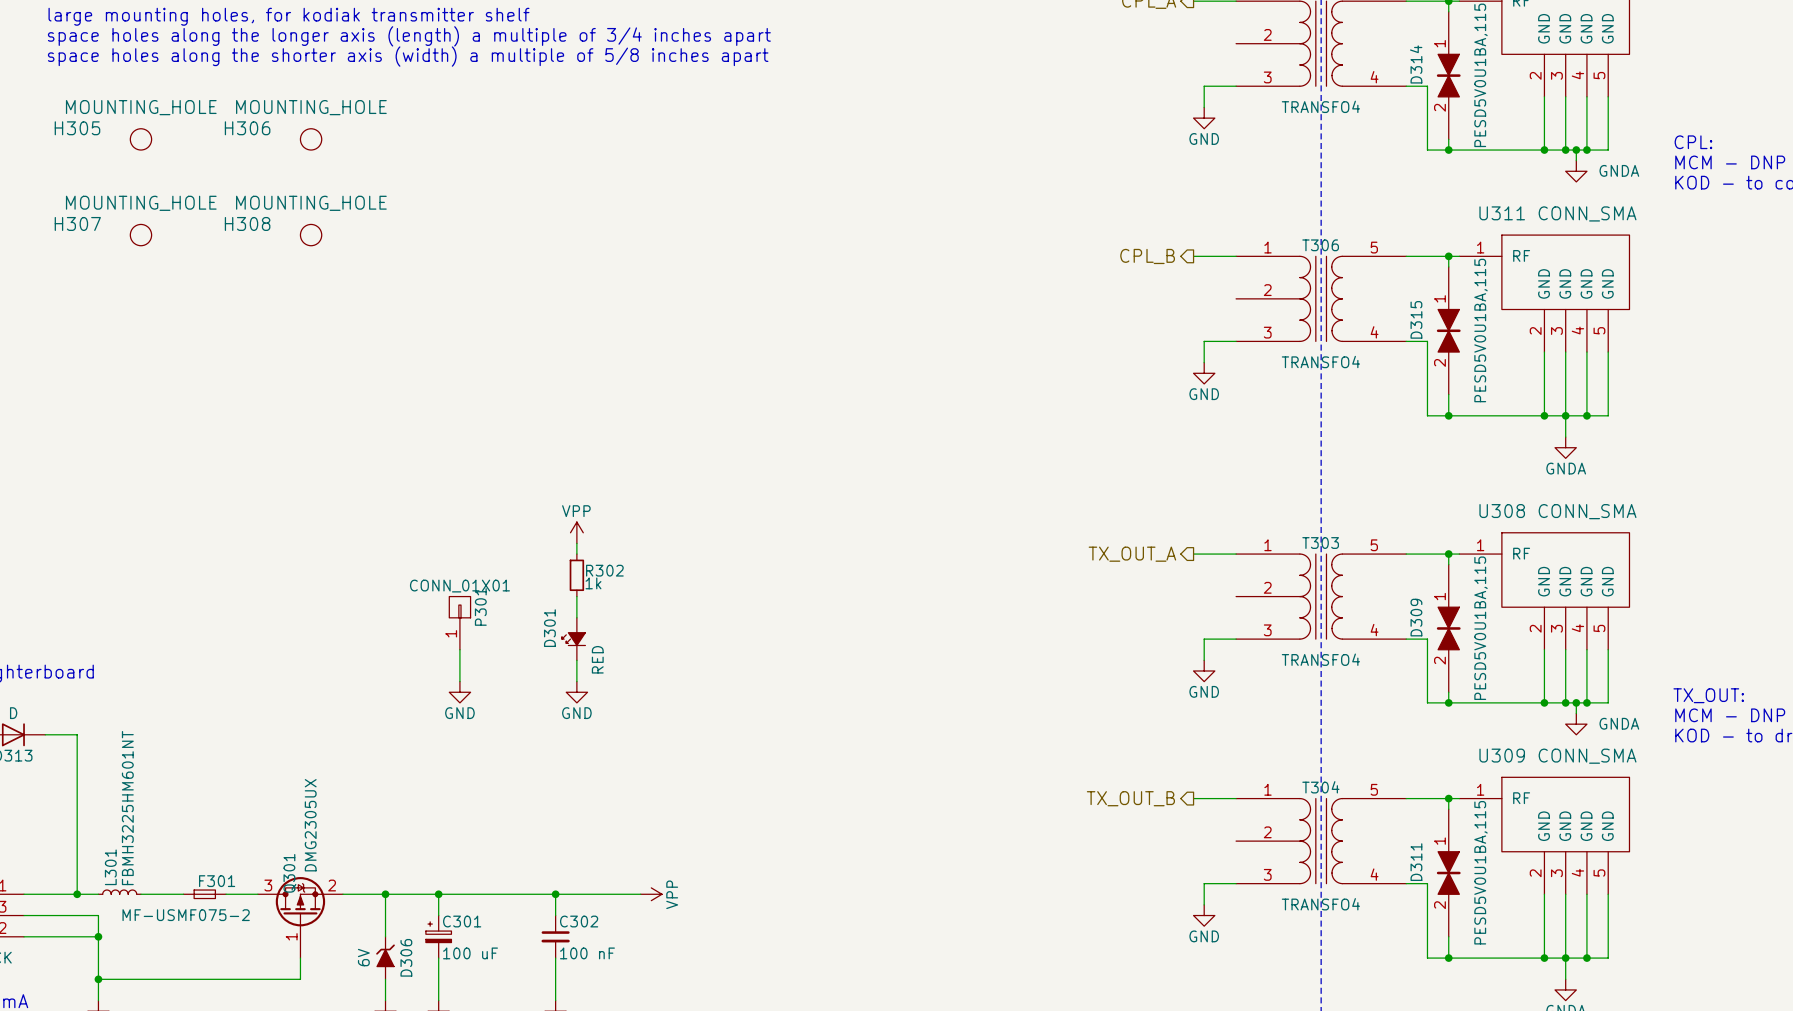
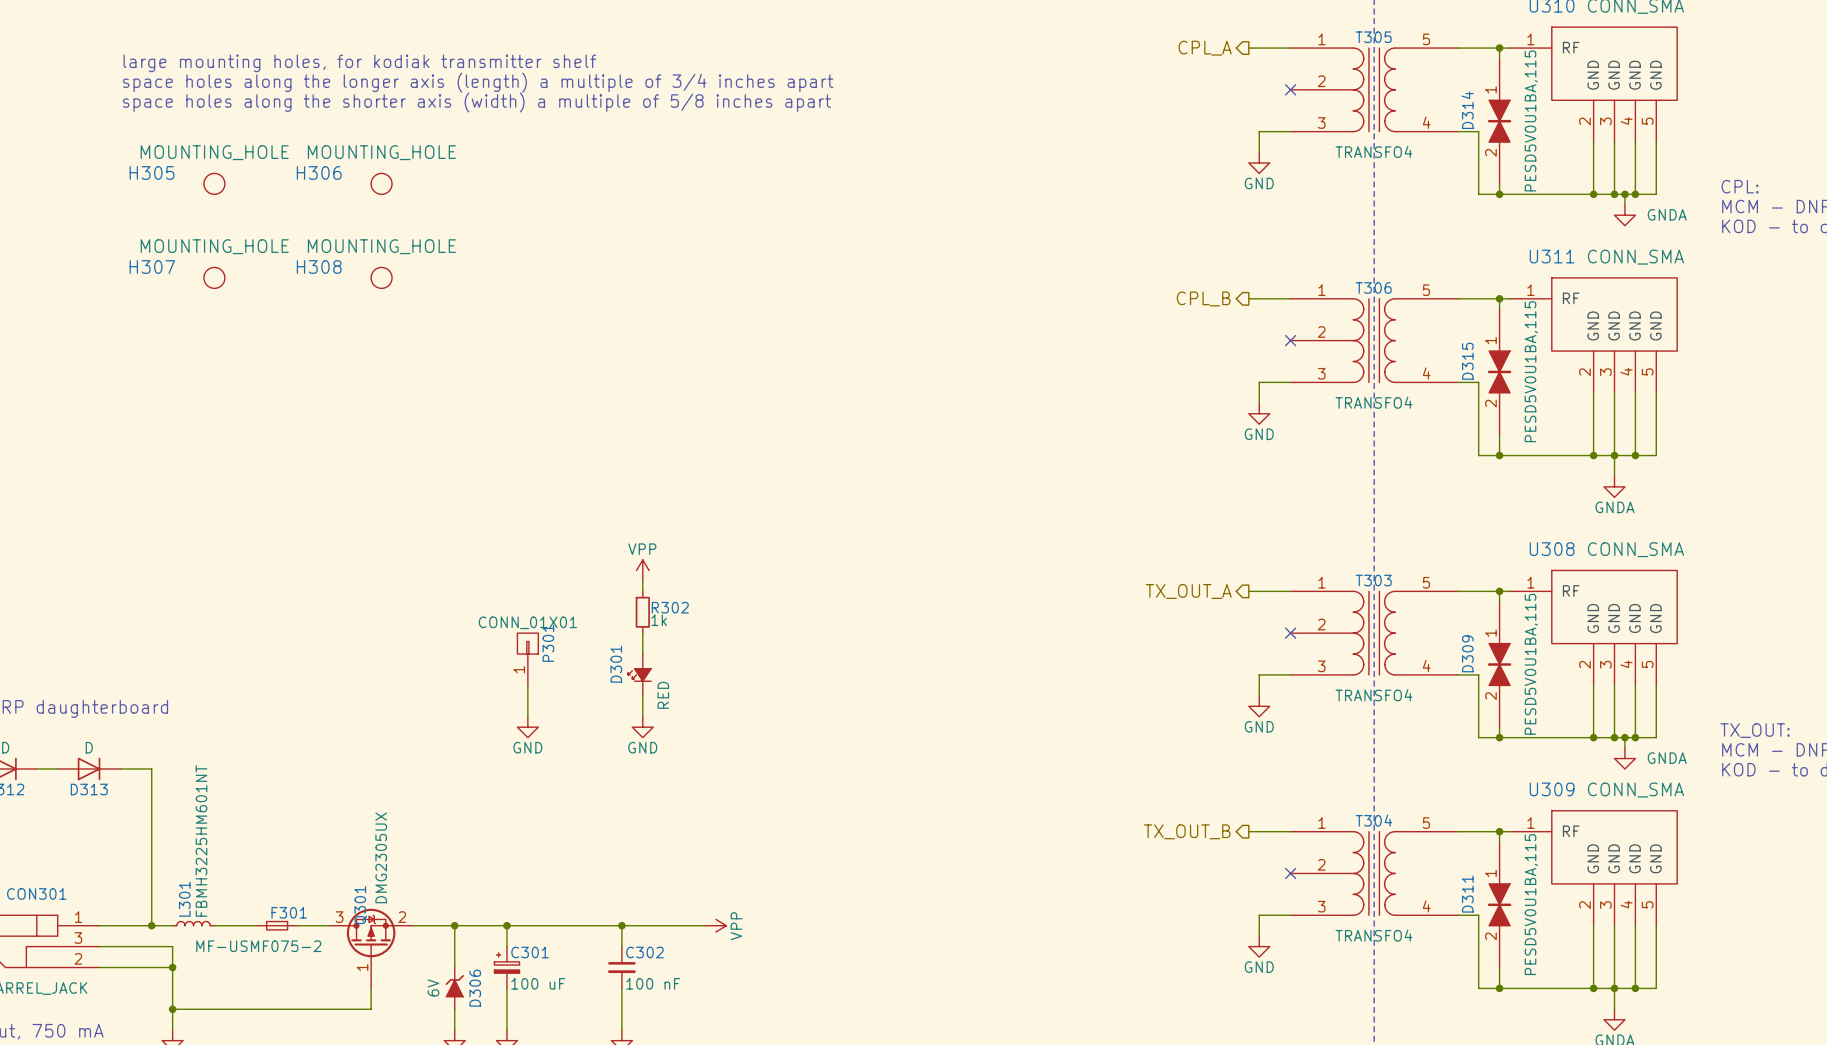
no-connect mark: none -> (1290, 89)
no-connect mark: none -> (1290, 340)
no-connect mark: none -> (1290, 633)
no-connect mark: none -> (1290, 873)

